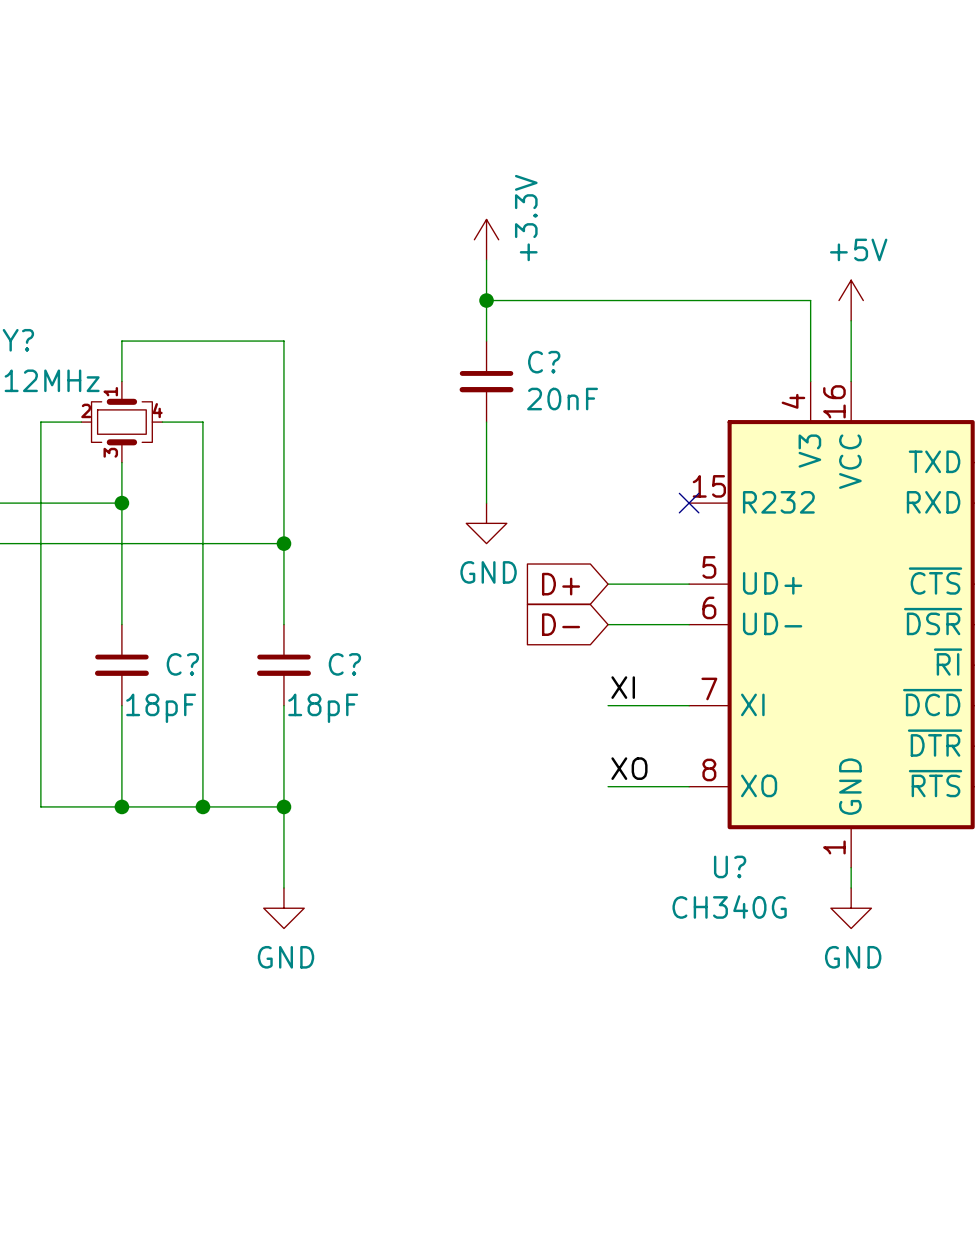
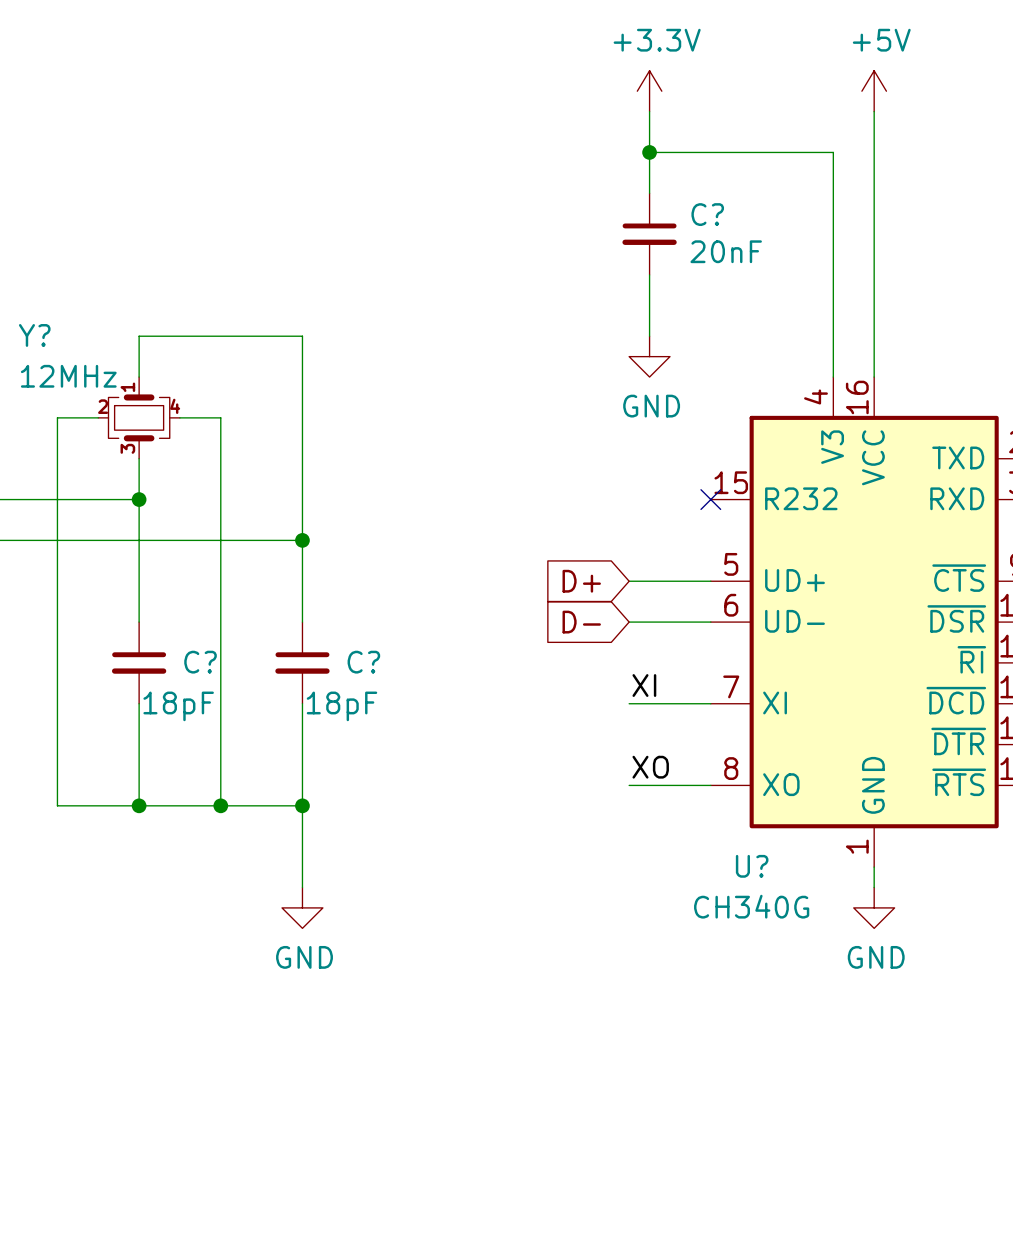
wire: none -> (874, 111) (874, 315)
junction: none -> (649, 152)
power symbol text rotation: 0° (526, 218) -> 90° clockwise (657, 40)
power symbol position: +3.3V (486, 239) -> +3.3V (649, 91)
wire: (486, 260) (486, 341) -> (649, 111) (649, 193)
wire: none -> (649, 274) (649, 336)
wire: (486, 300) (810, 300) -> (649, 152) (833, 152) (833, 295)
junction: (486, 300) -> none
power symbol position: +5V (851, 300) -> +5V (874, 91)
C? position: (486, 381) -> (649, 234)
wire: (486, 422) (486, 503) -> none
power symbol position: GND (486, 523) -> GND (649, 356)

